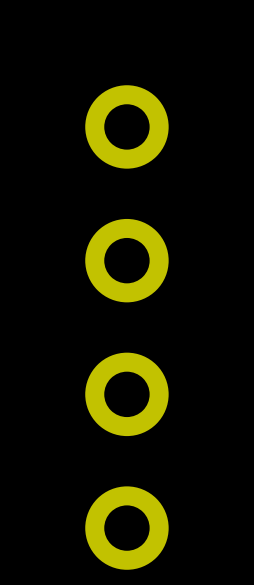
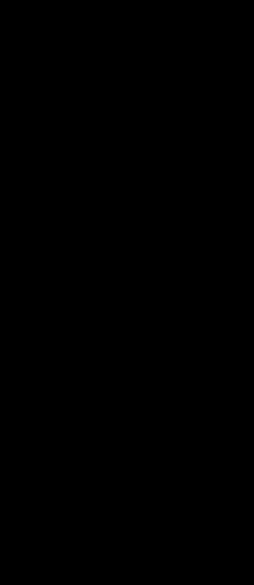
part: (126, 126) -> none
part: (126, 260) -> none
part: (126, 394) -> none
part: (126, 528) -> none

